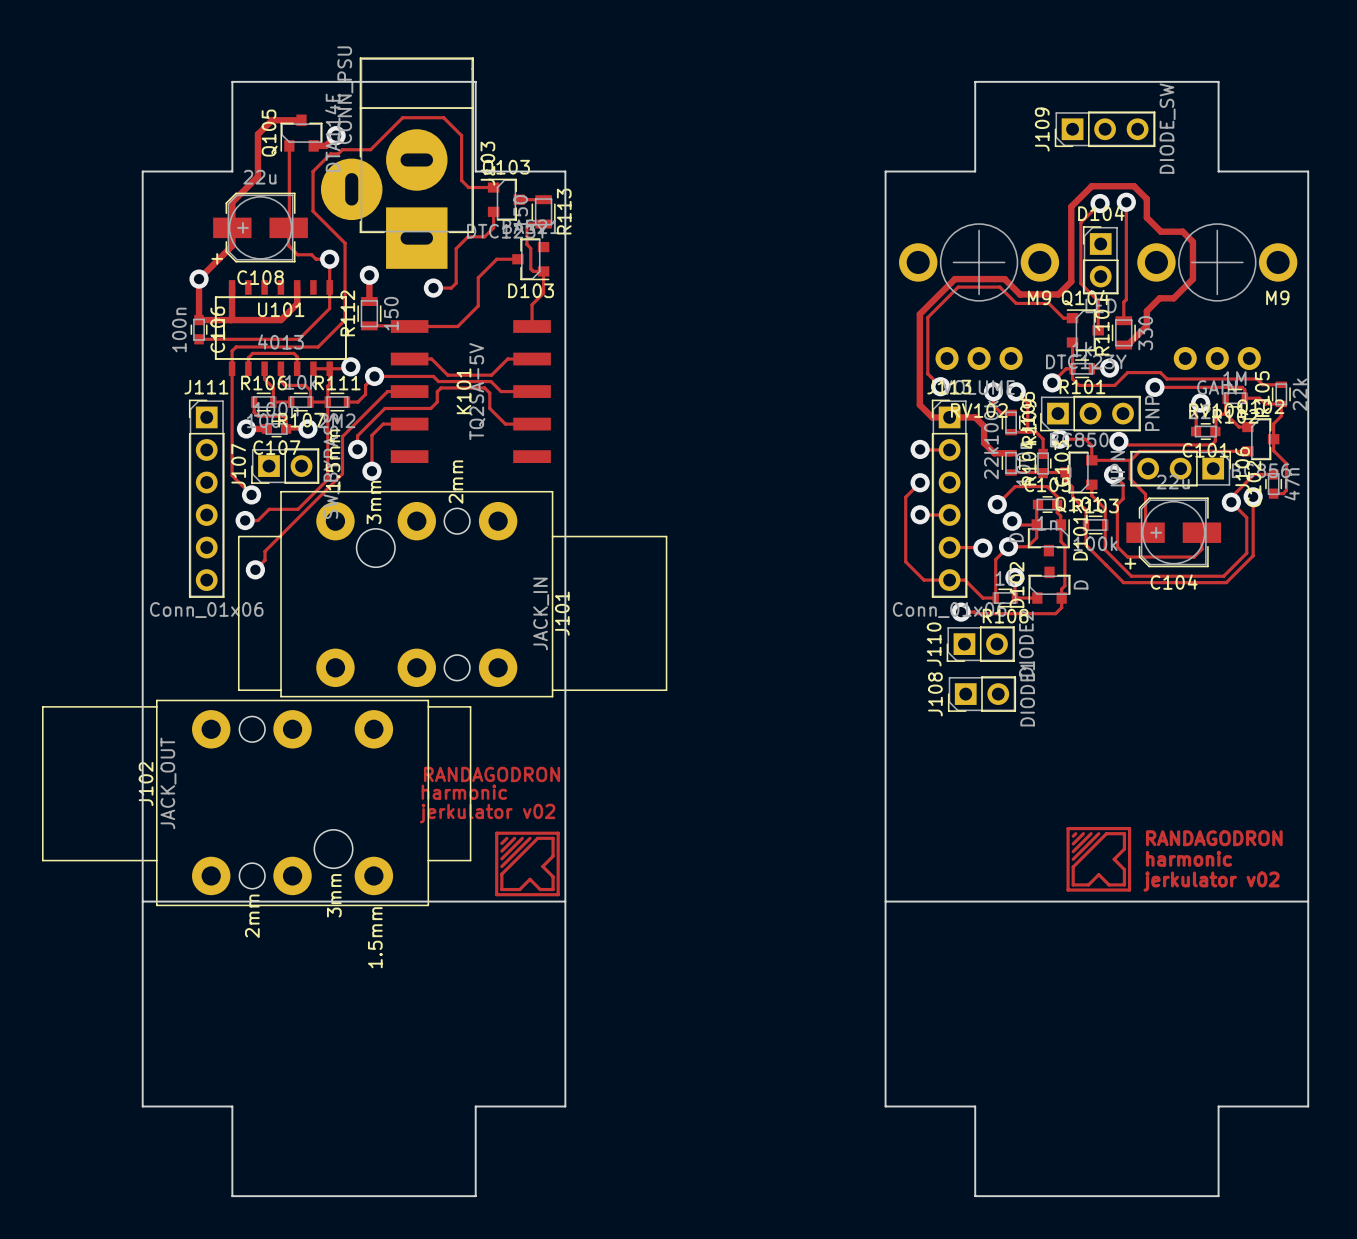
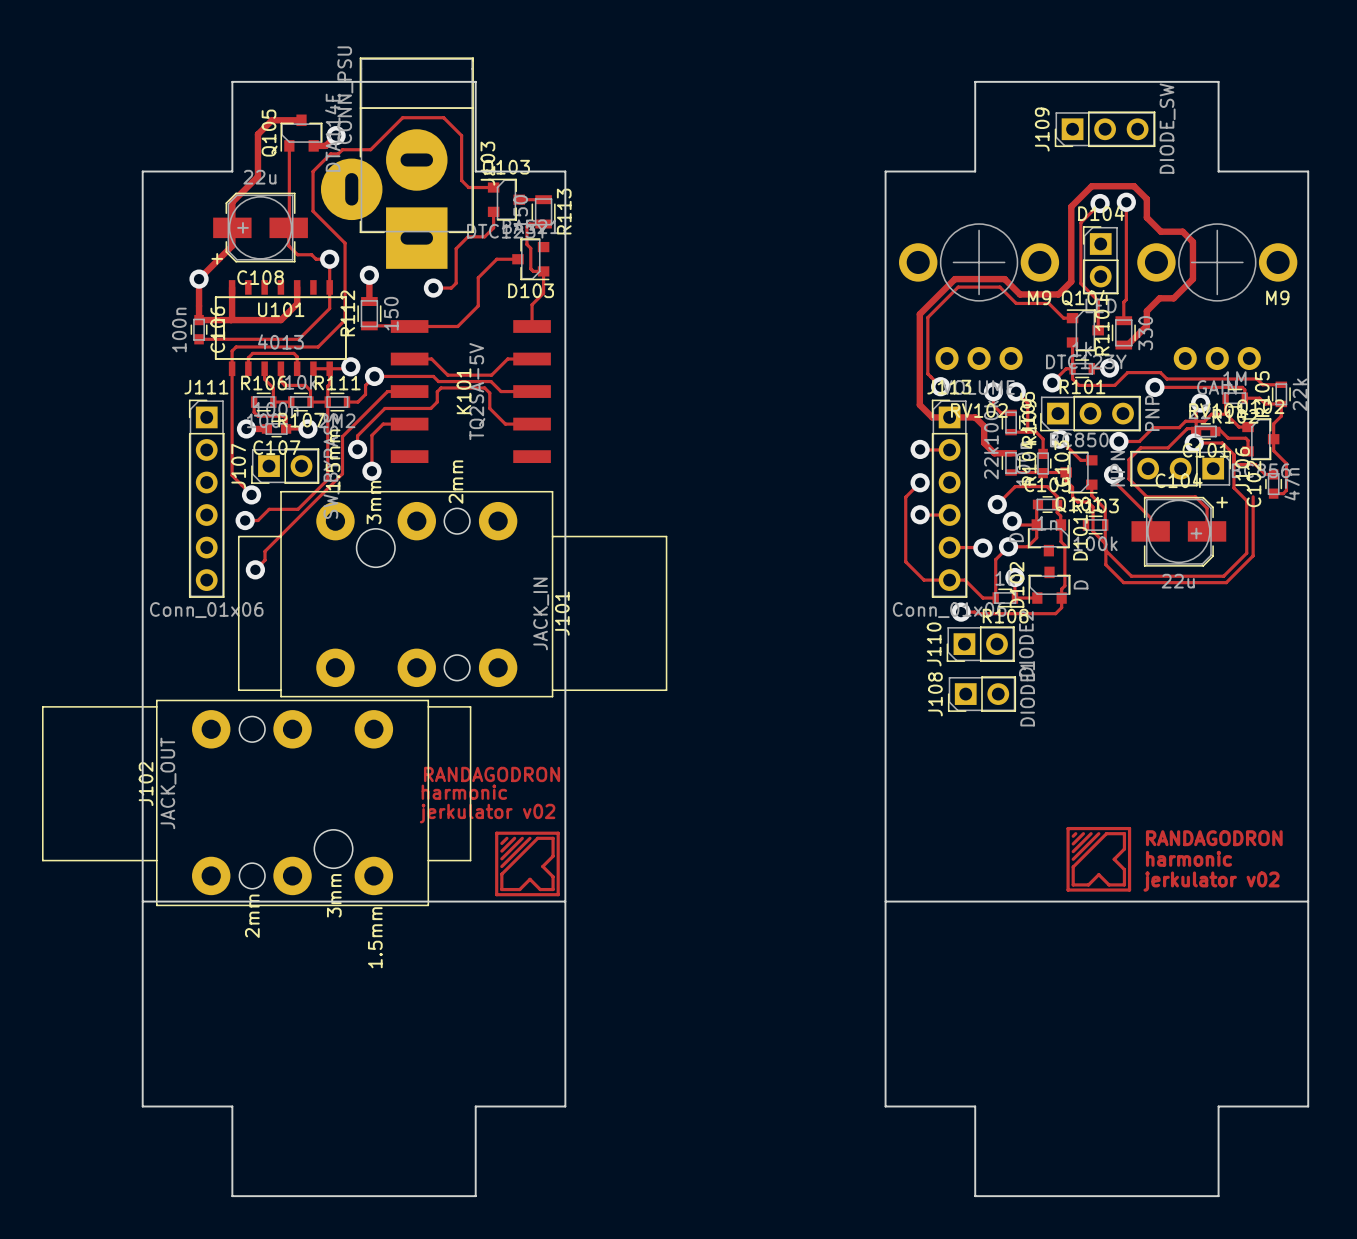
track: (1221, 414) (1216, 419) (1215, 441) (1211, 444) (1122, 444) (1118, 441) -> (1221, 414) (1211, 414) (1204, 421) (1185, 421) (1179, 427) (1153, 427) (1139, 441) (1118, 441)
track: (1059, 439) (1085, 439) (1091, 445) (1091, 460) (1130, 460) -> (1059, 439) (1080, 460) (1091, 460)
track: none -> (1194, 443) (1222, 443) (1233, 454) (1233, 487) (1246, 500) (1246, 517)
via: none -> (1194, 443)
track: (1248, 451) (1139, 451) (1130, 460) -> (1248, 451) (1248, 440) (1245, 438) (1228, 438) (1218, 428) (1187, 428) (1168, 447) (1140, 447) (1128, 459) (1128, 478) (1146, 496) (1195, 496) (1207, 508) (1207, 531)
track: (1130, 460) (1130, 478) (1145, 494) (1145, 532) -> none
track: none -> (1113, 473) (1113, 480) (1150, 517) (1150, 531)
track: (1113, 474) (1123, 484) (1123, 498) (1117, 504) (1117, 546) (1127, 557) (1194, 557) (1201, 549) (1201, 532) -> none
track: (1265, 474) (1254, 474) (1231, 497) (1231, 502) (1246, 517) -> (1265, 474) (1255, 464) (1233, 464)
via: (1253, 496) -> none
track: (1077, 501) (1086, 510) (1086, 544) (1105, 564) -> (1077, 501) (1087, 501) (1093, 507) (1093, 531) (1105, 544) (1105, 564)
via: (1231, 502) -> none
C104 rotation: 0° (1173, 532) -> 180° (1178, 531)

